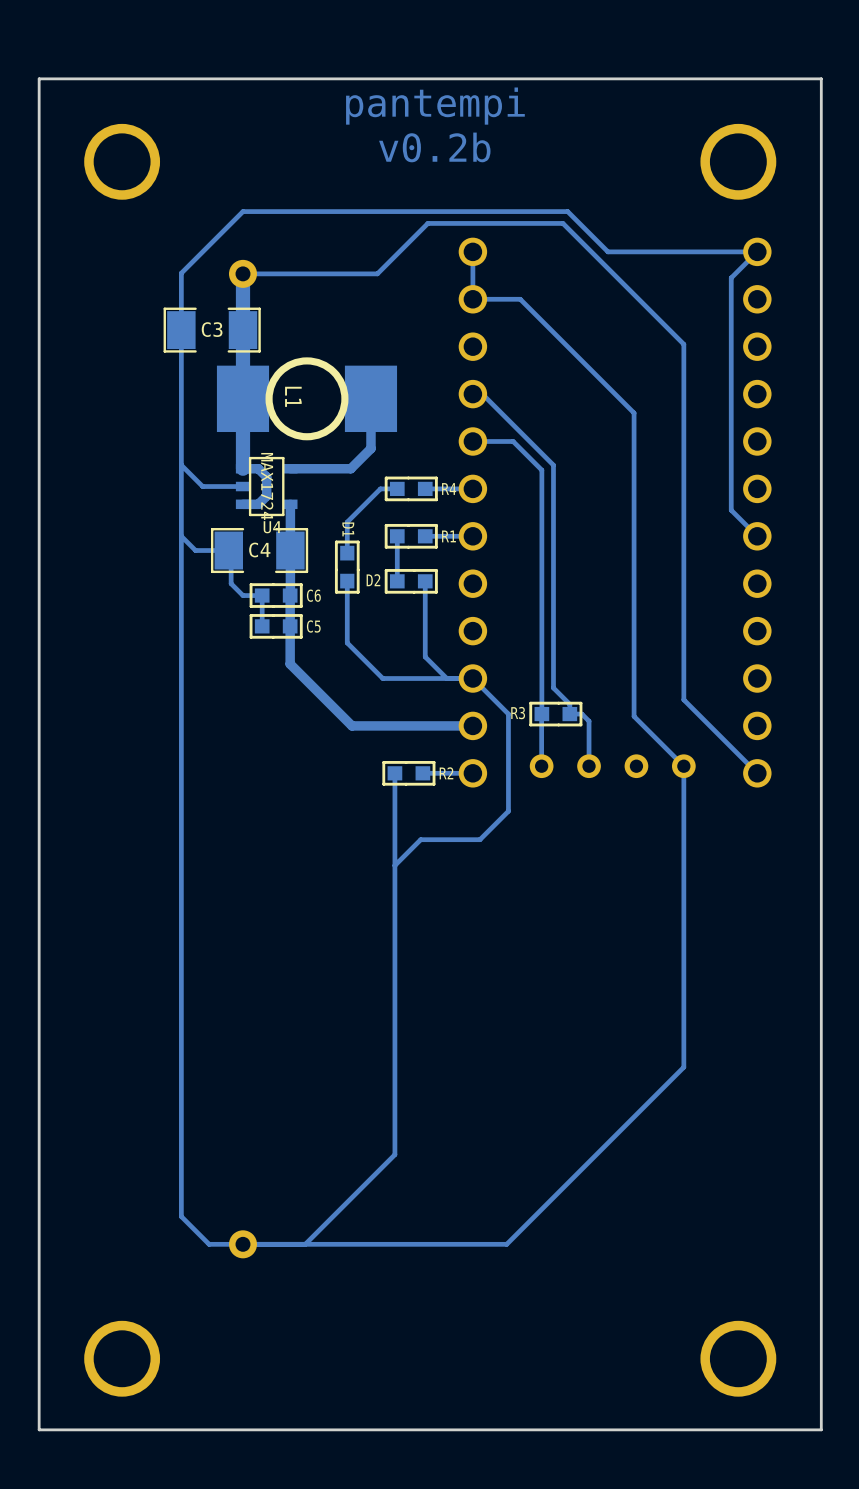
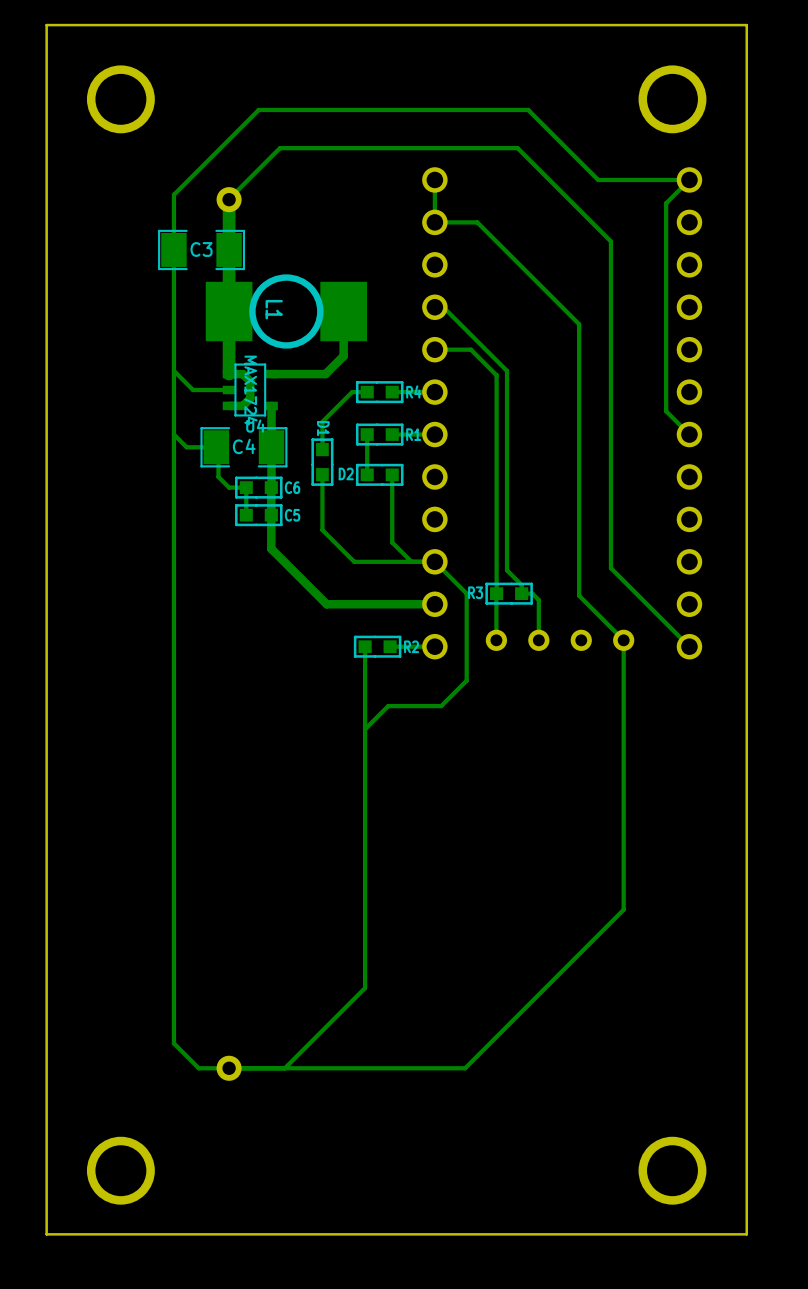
text: pantempi (435, 106) -> none
text: v0.2b (434, 147) -> none
track: (655, 251) (608, 251) (567, 211) (242, 211) (181, 273) -> (598, 179) (528, 109) (258, 109) (173, 194) (173, 199)
track: (242, 273) (377, 273) (427, 223) (562, 223) (683, 344) (683, 699) -> (229, 199) (280, 148) (517, 148) (610, 241) (610, 568) (623, 580)

